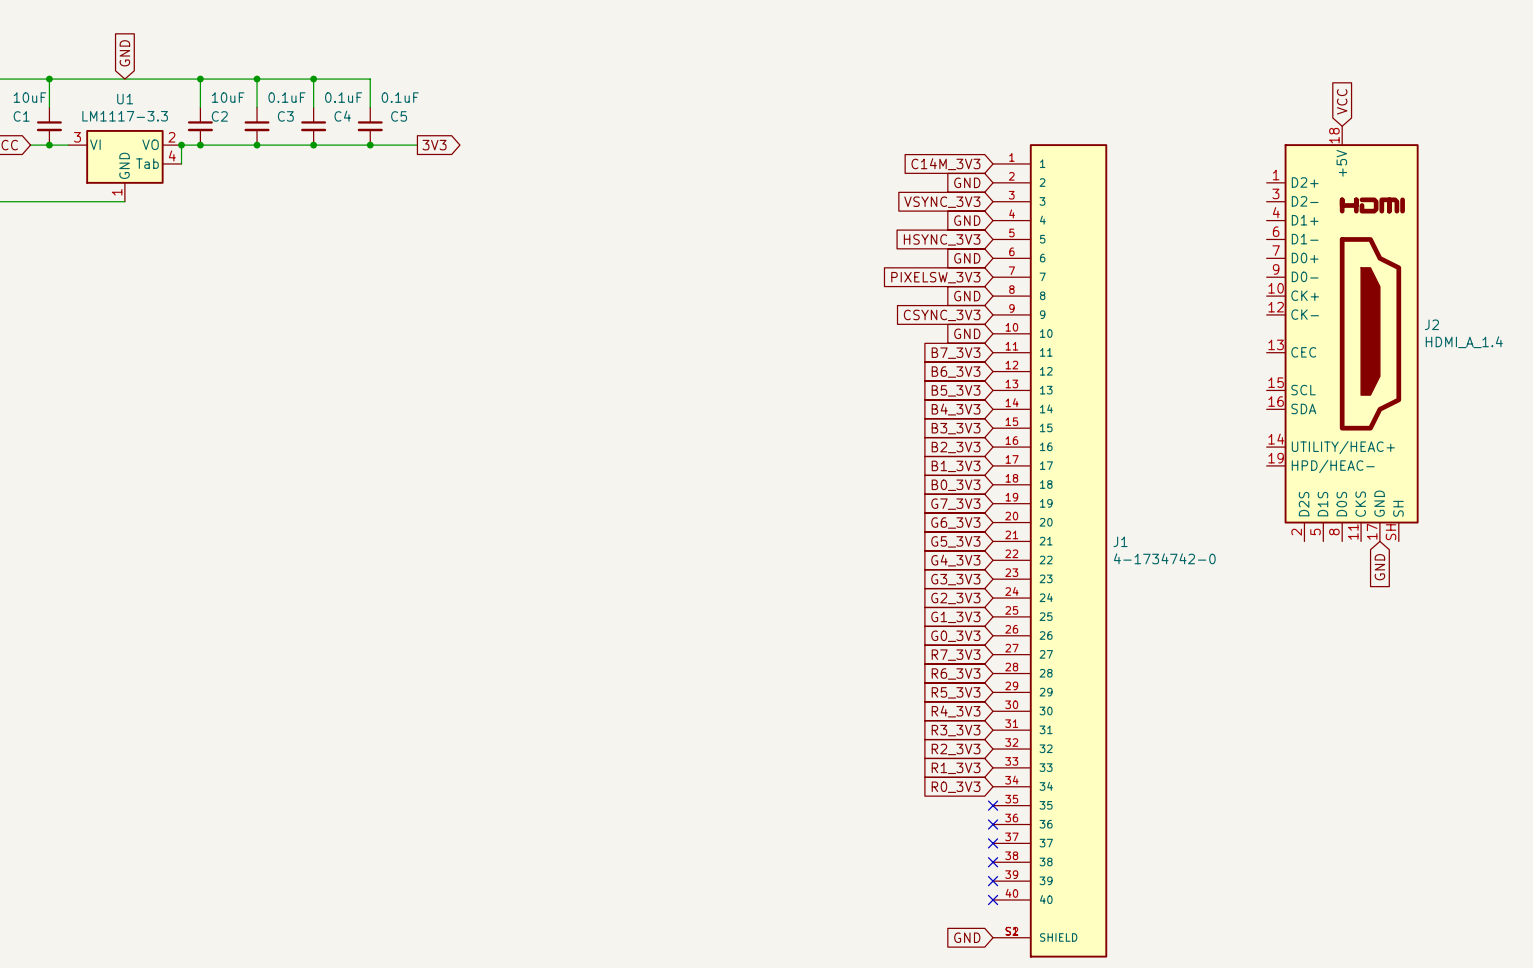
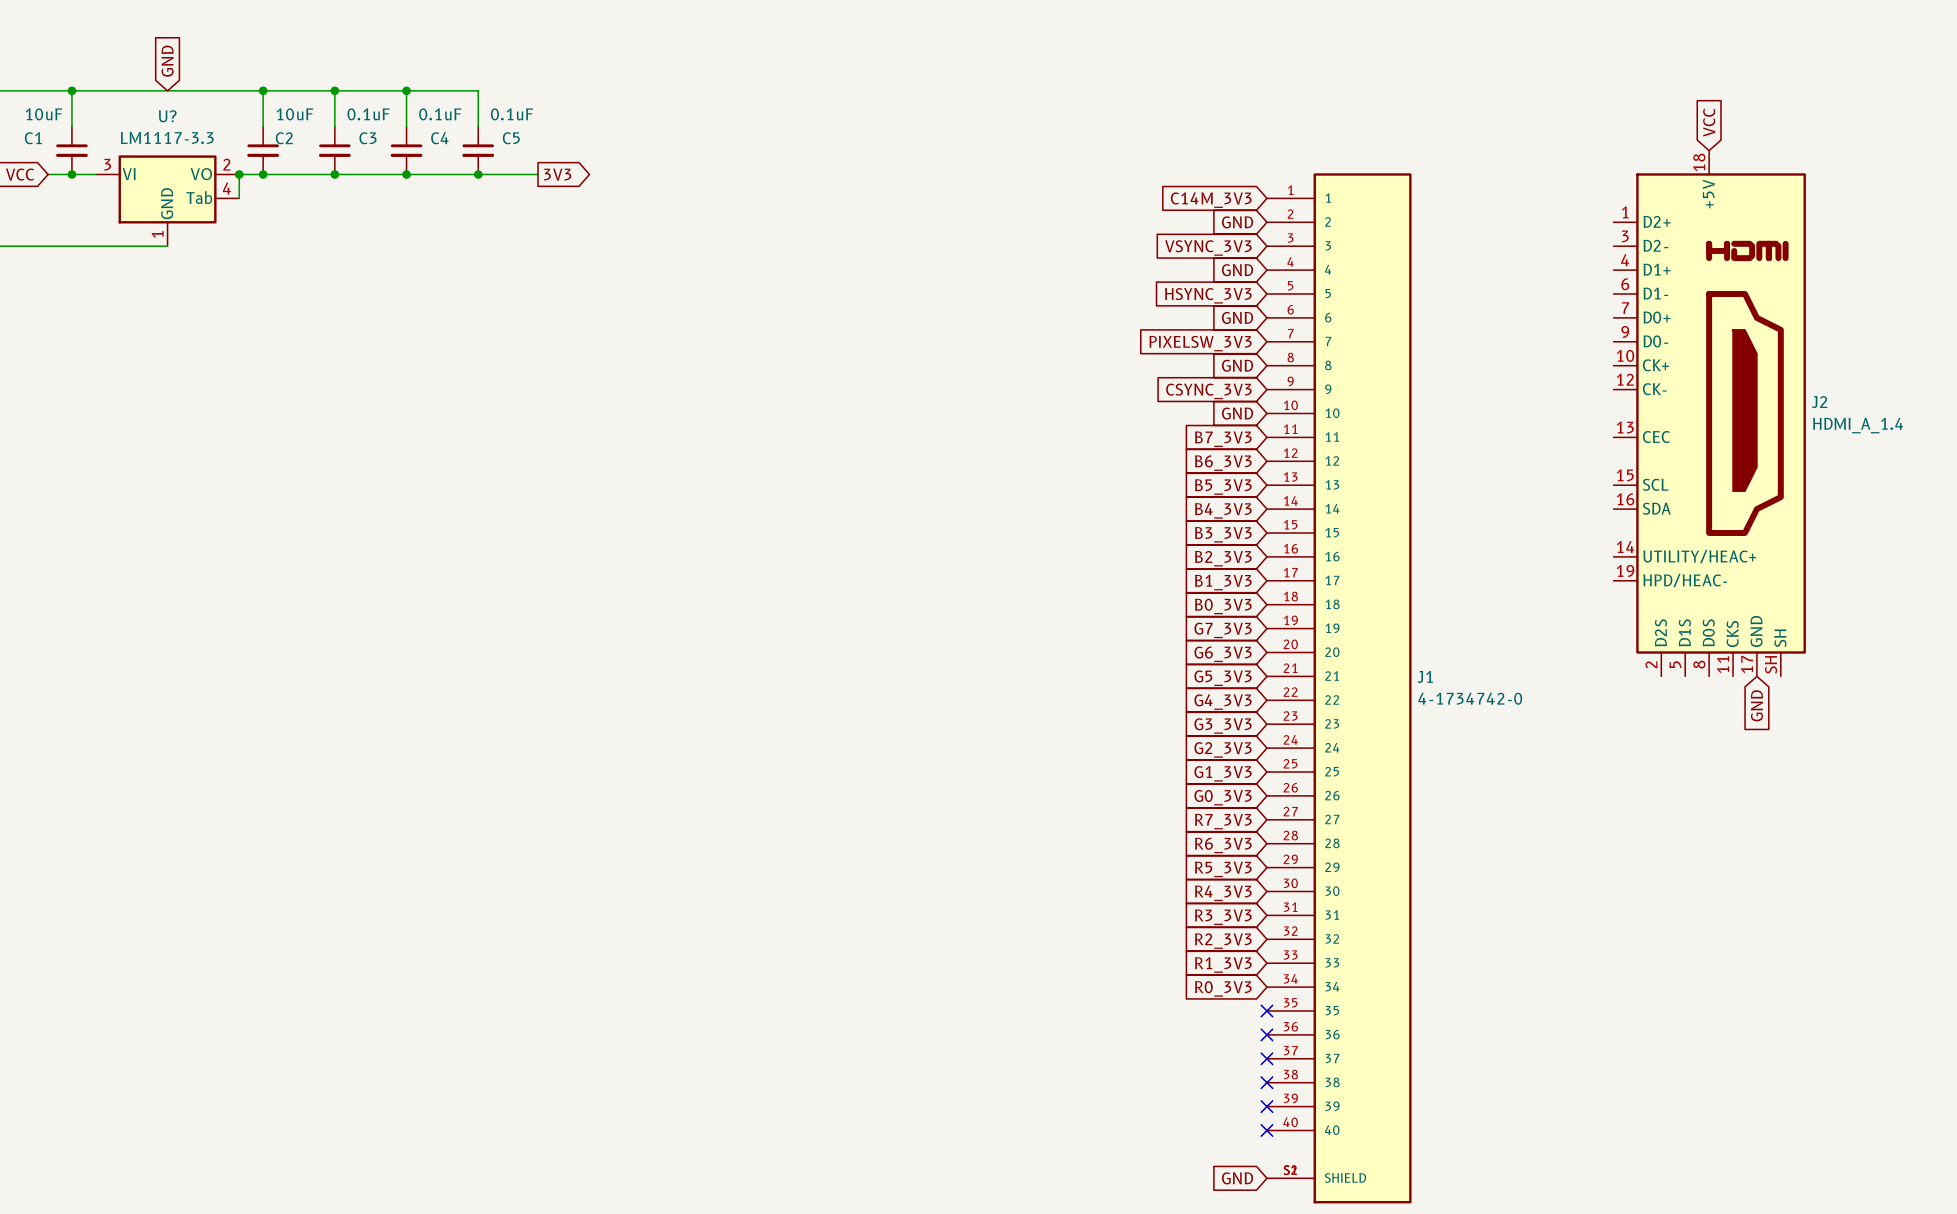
U1 name: U1 (125, 99) -> U? (167, 116)

